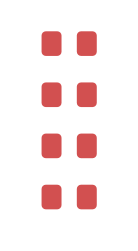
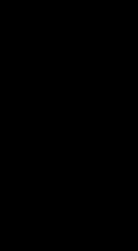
part: (69, 43) -> none
part: (69, 94) -> none
part: (69, 145) -> none
part: (69, 197) -> none

